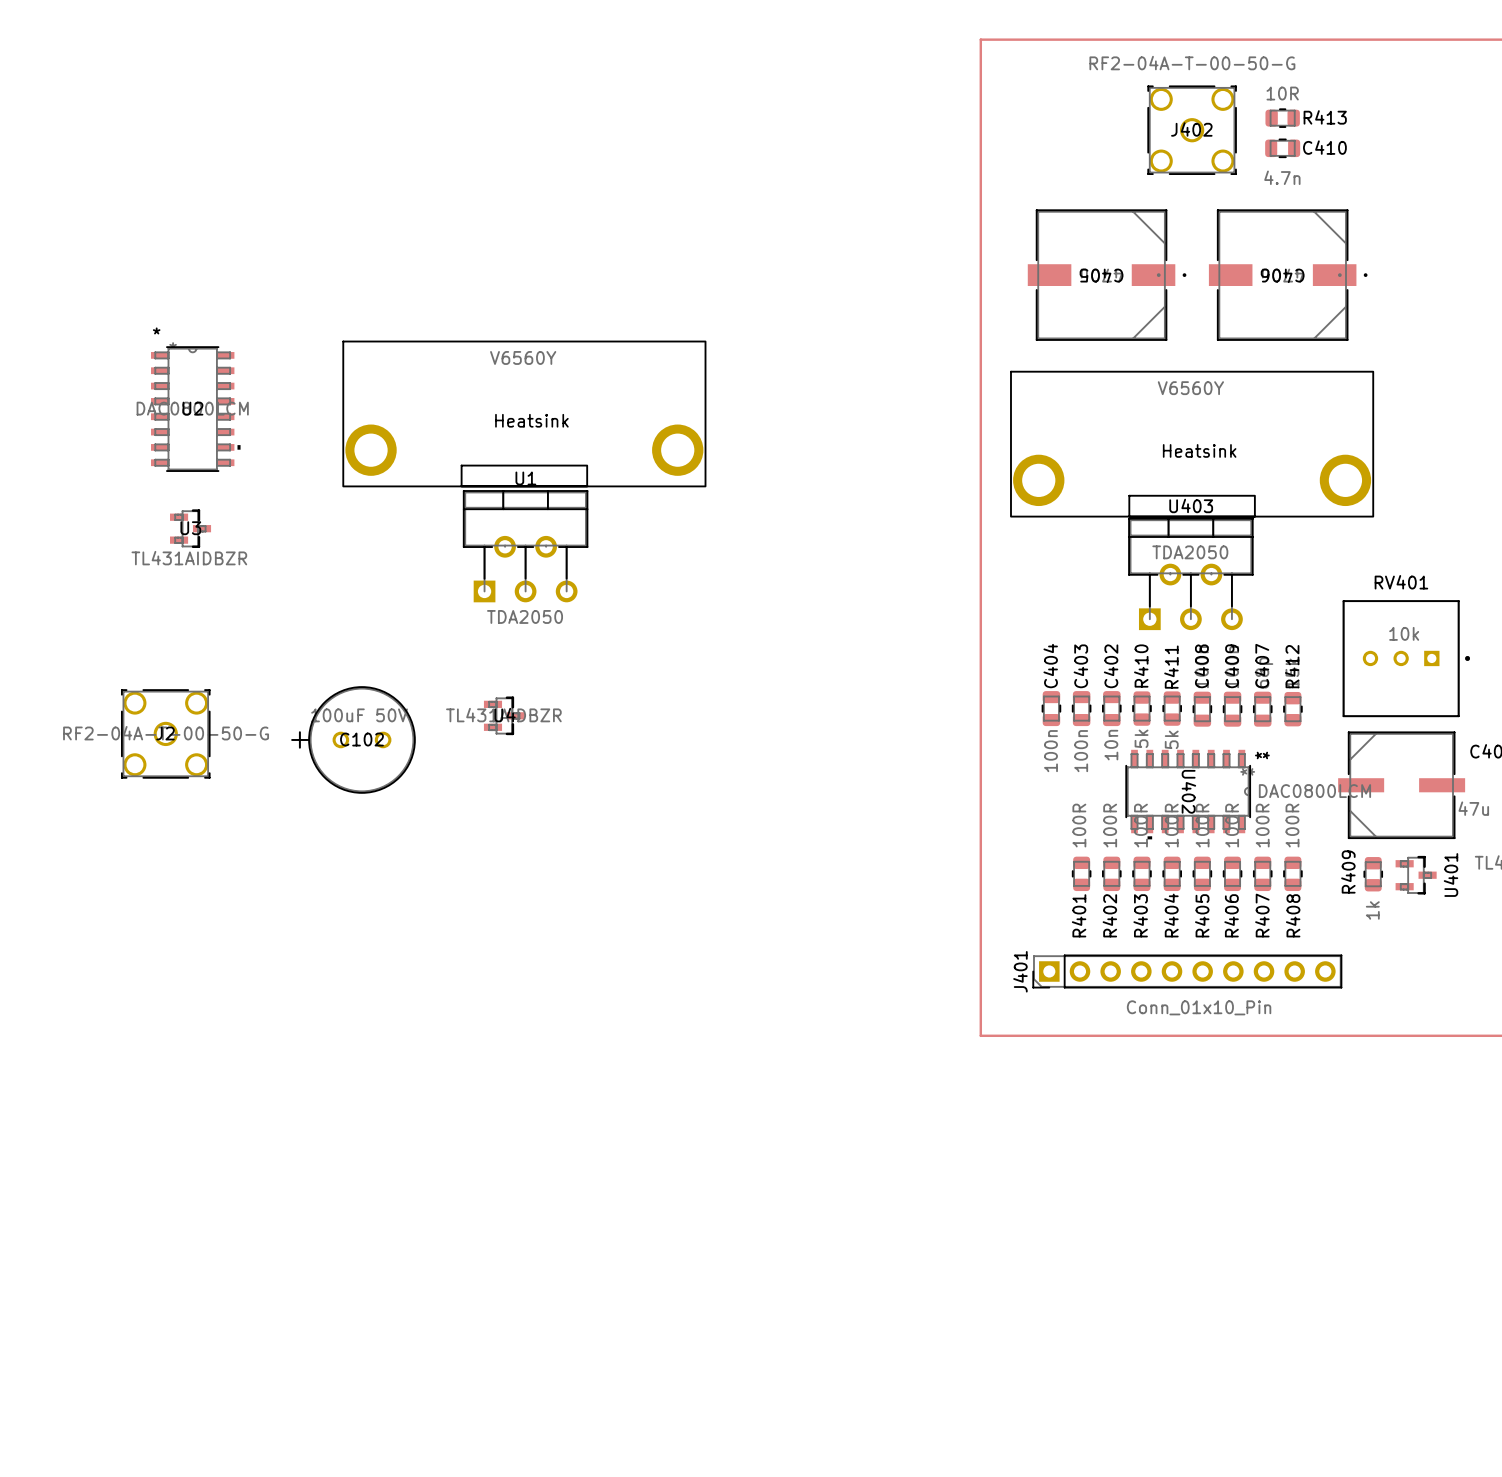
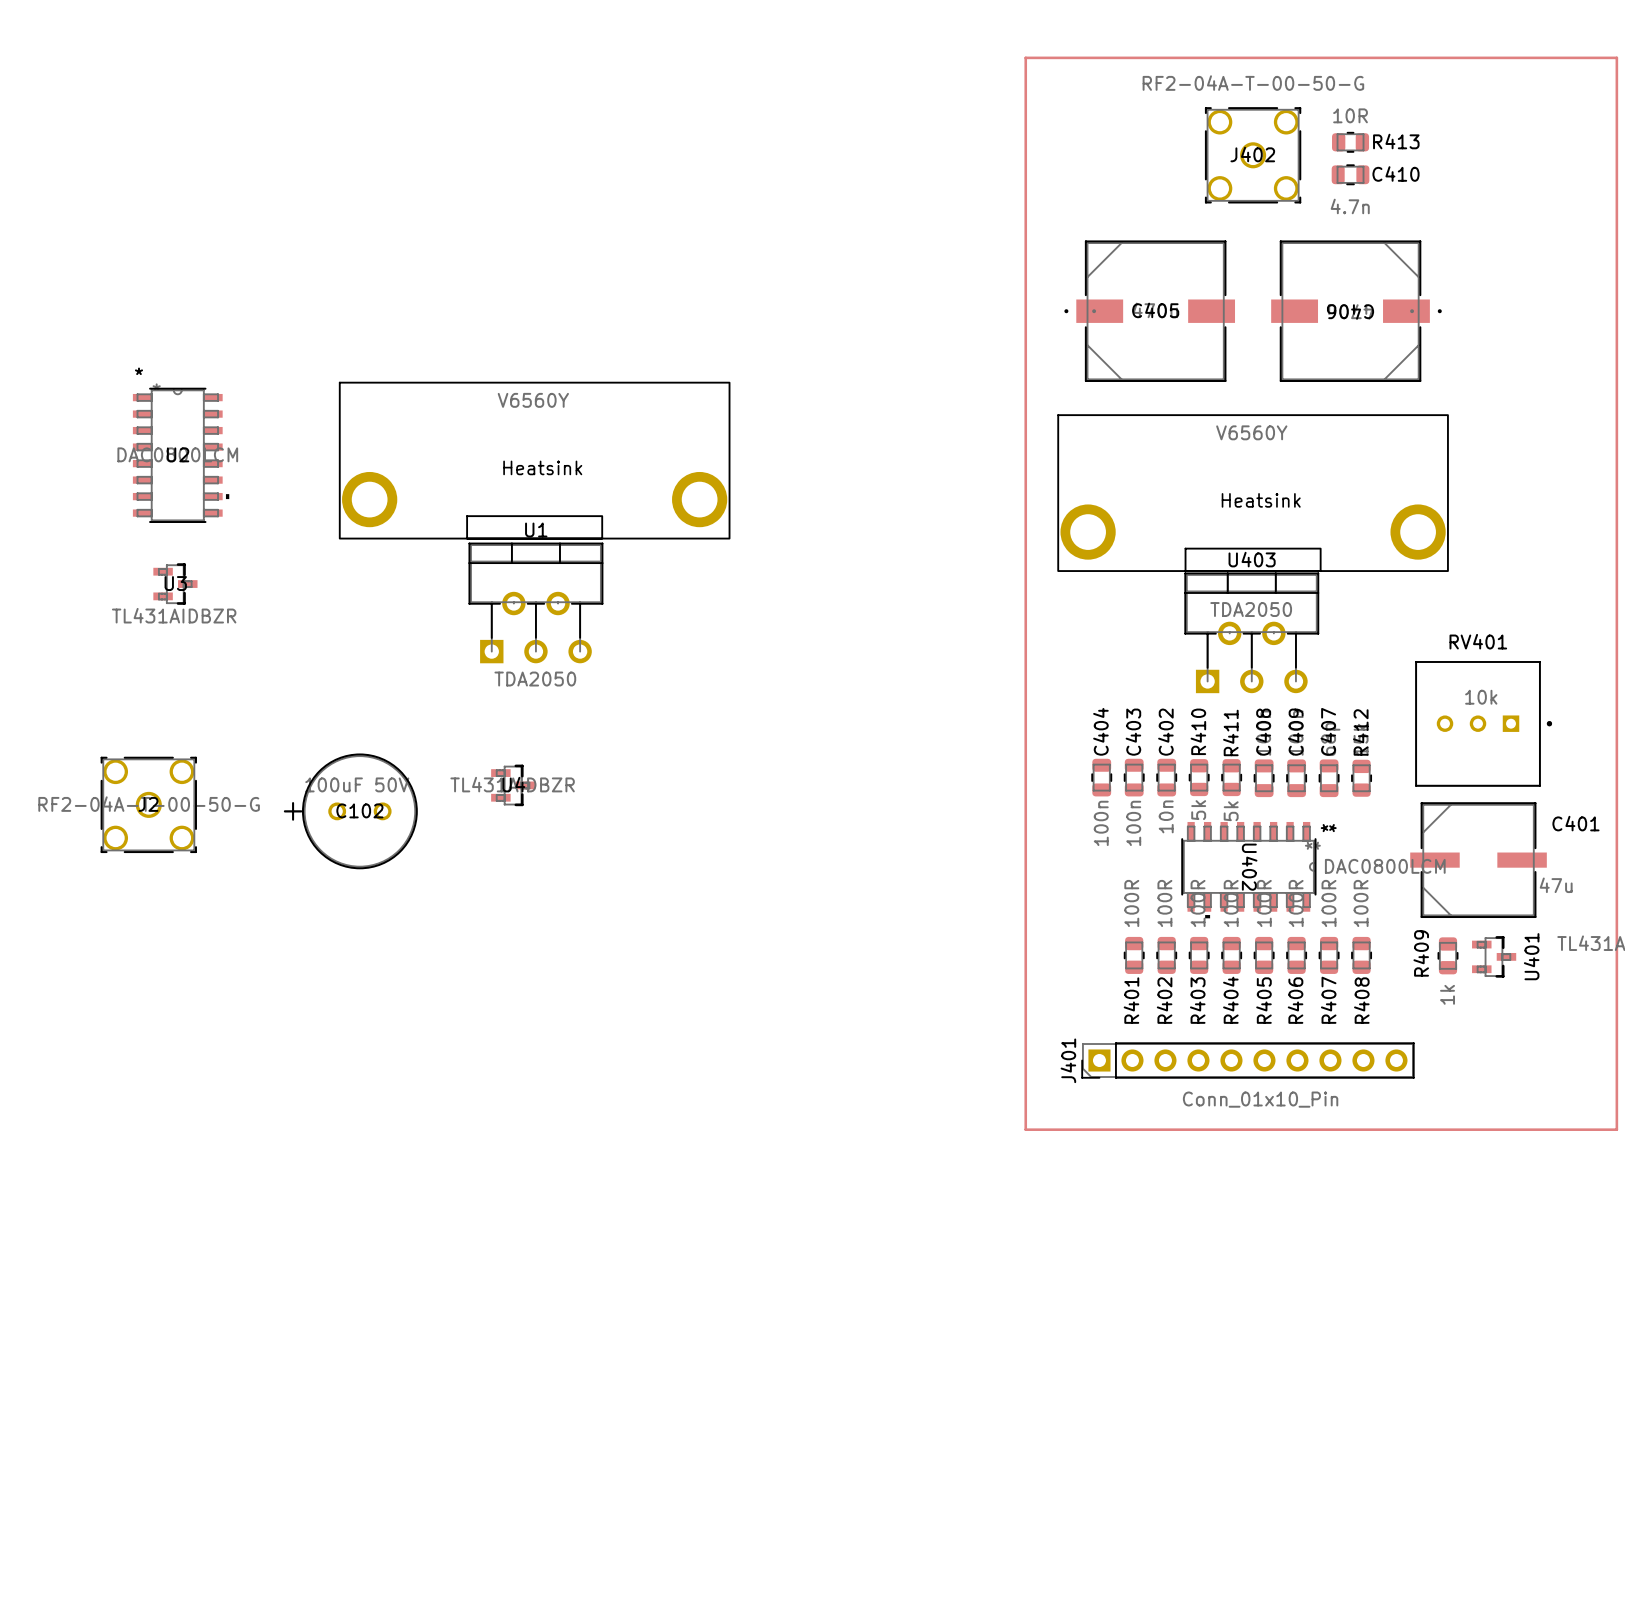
C405 rotation: 0° (1107, 275) -> 180° (1149, 311)

